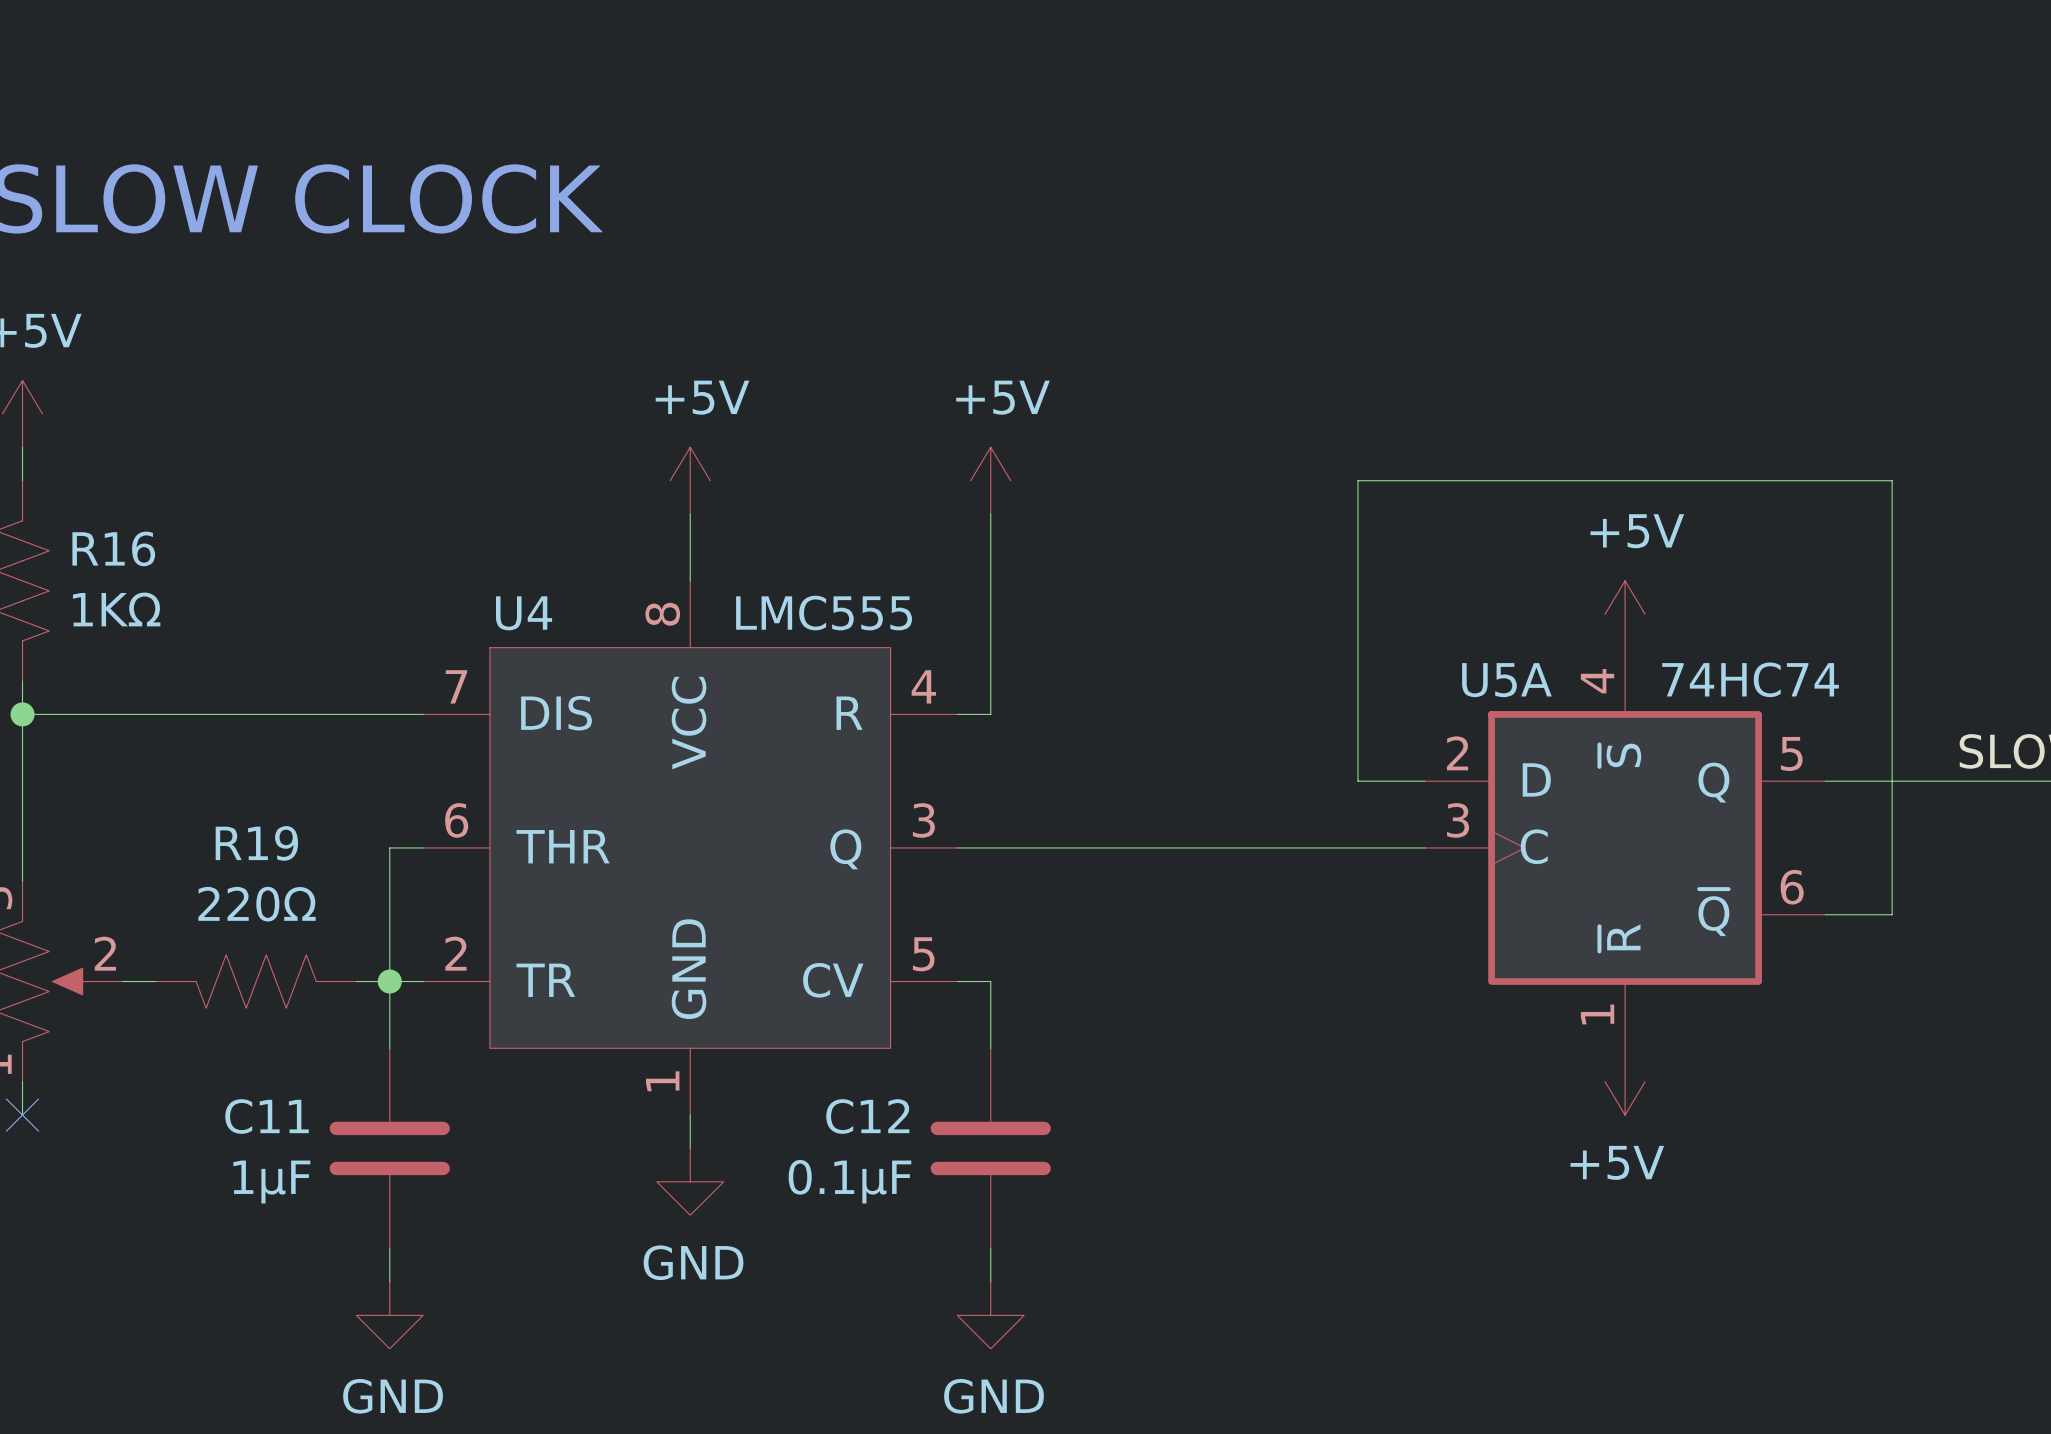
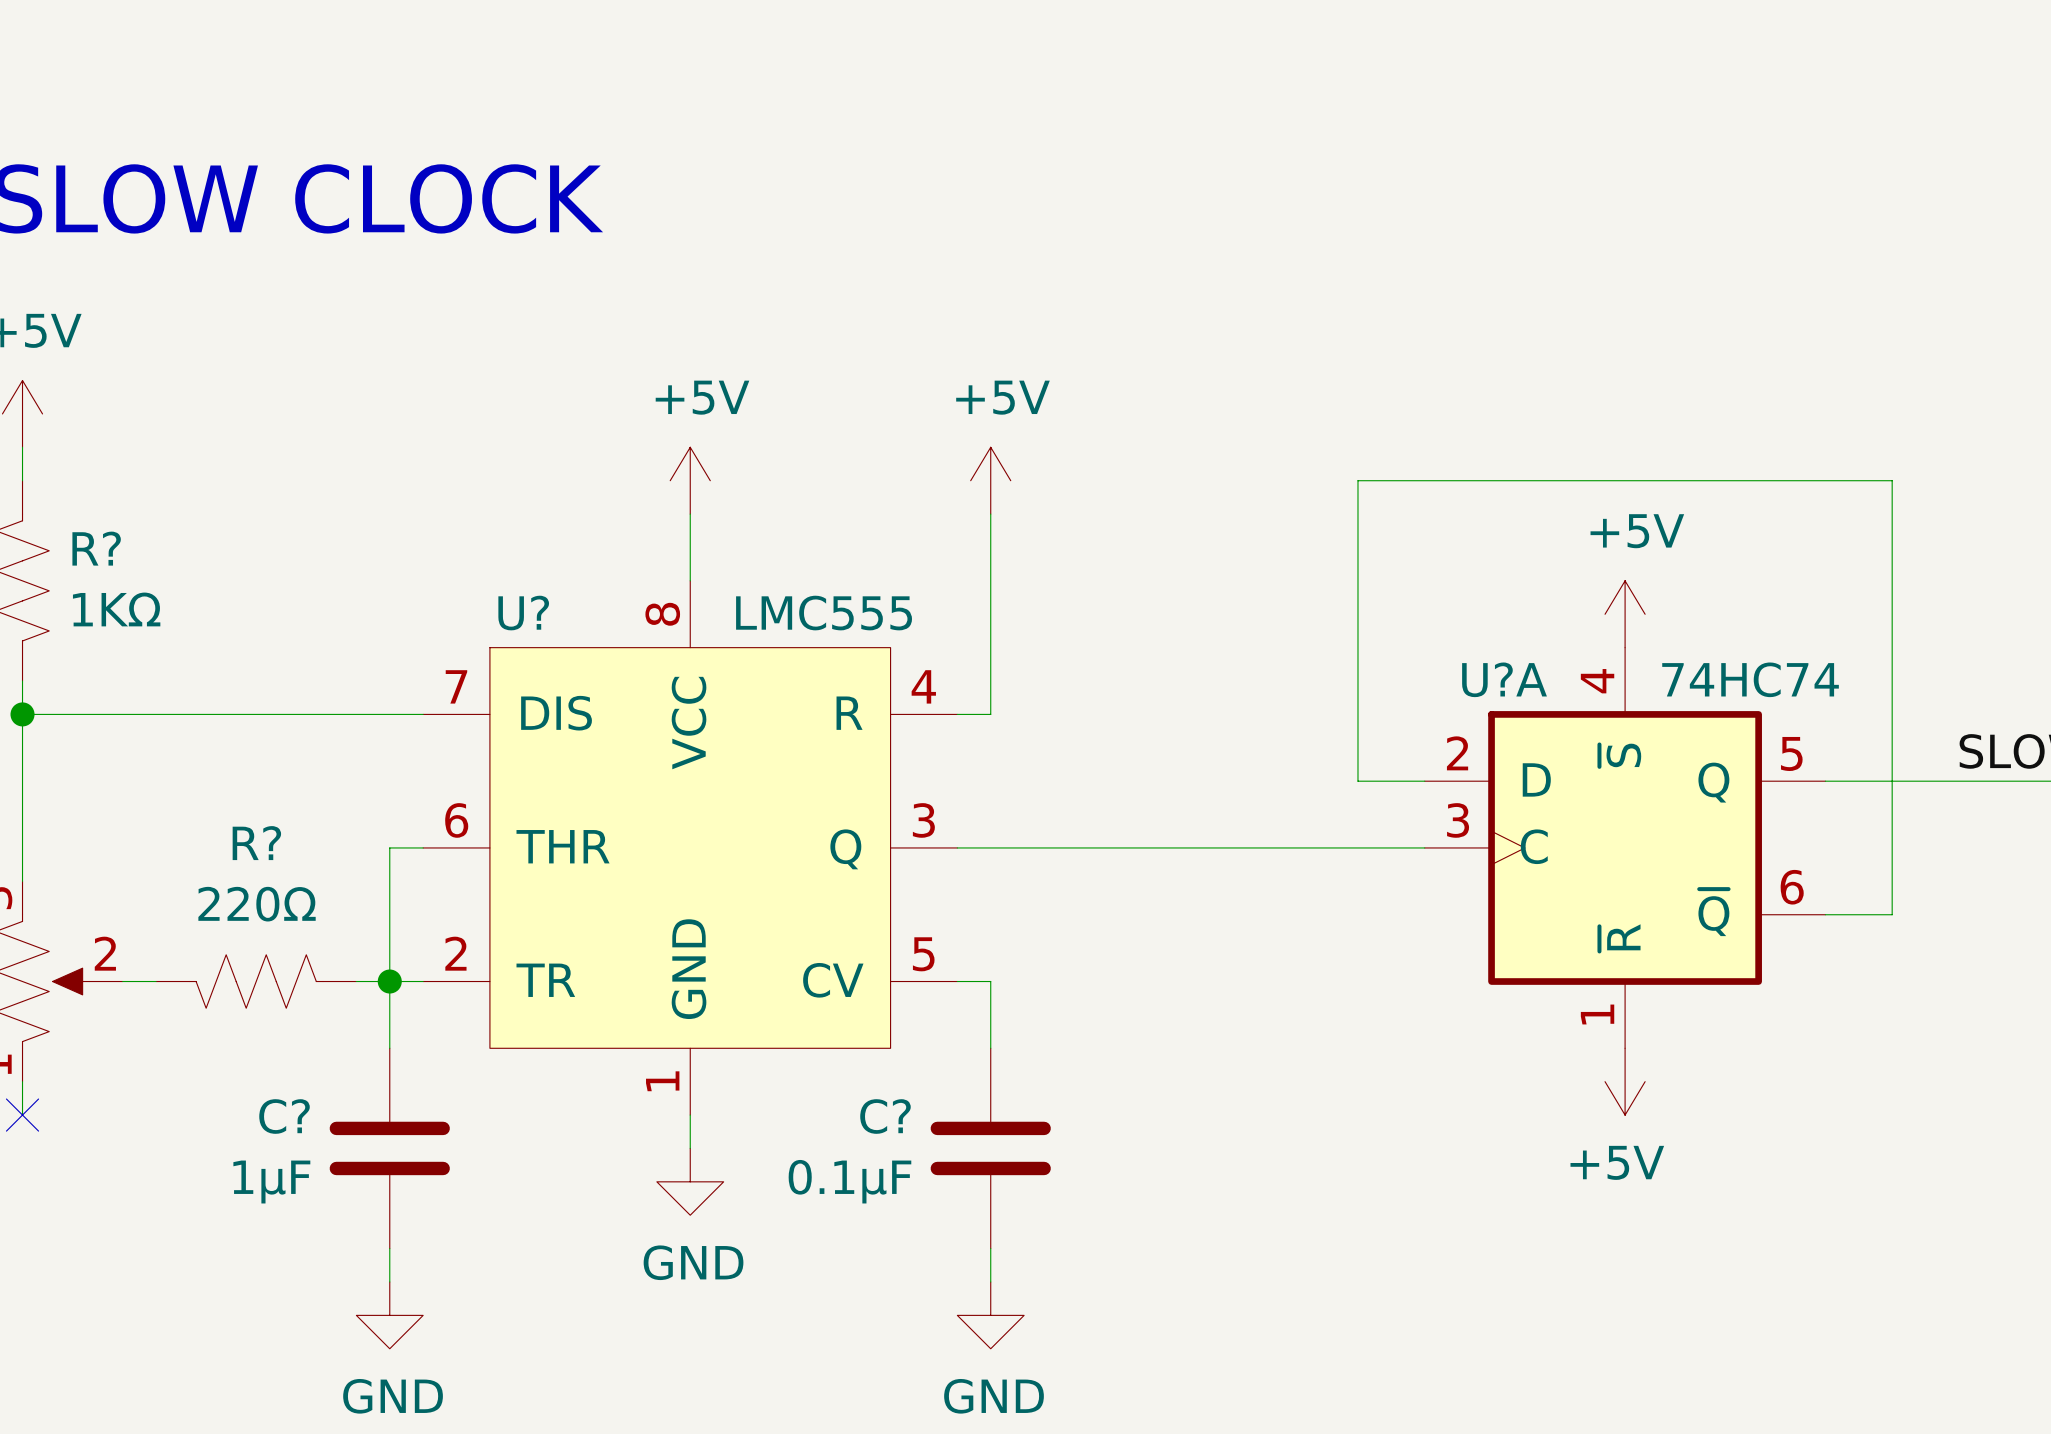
R16 name: R16 (113, 548) -> R? (96, 548)
U4 name: U4 (524, 613) -> U? (523, 613)
U5A name: U5A (1506, 680) -> U?A (1504, 679)
R19 name: R19 (256, 843) -> R? (256, 843)
C11 name: C11 (267, 1116) -> C? (284, 1116)
C12 name: C12 (867, 1116) -> C? (885, 1116)

